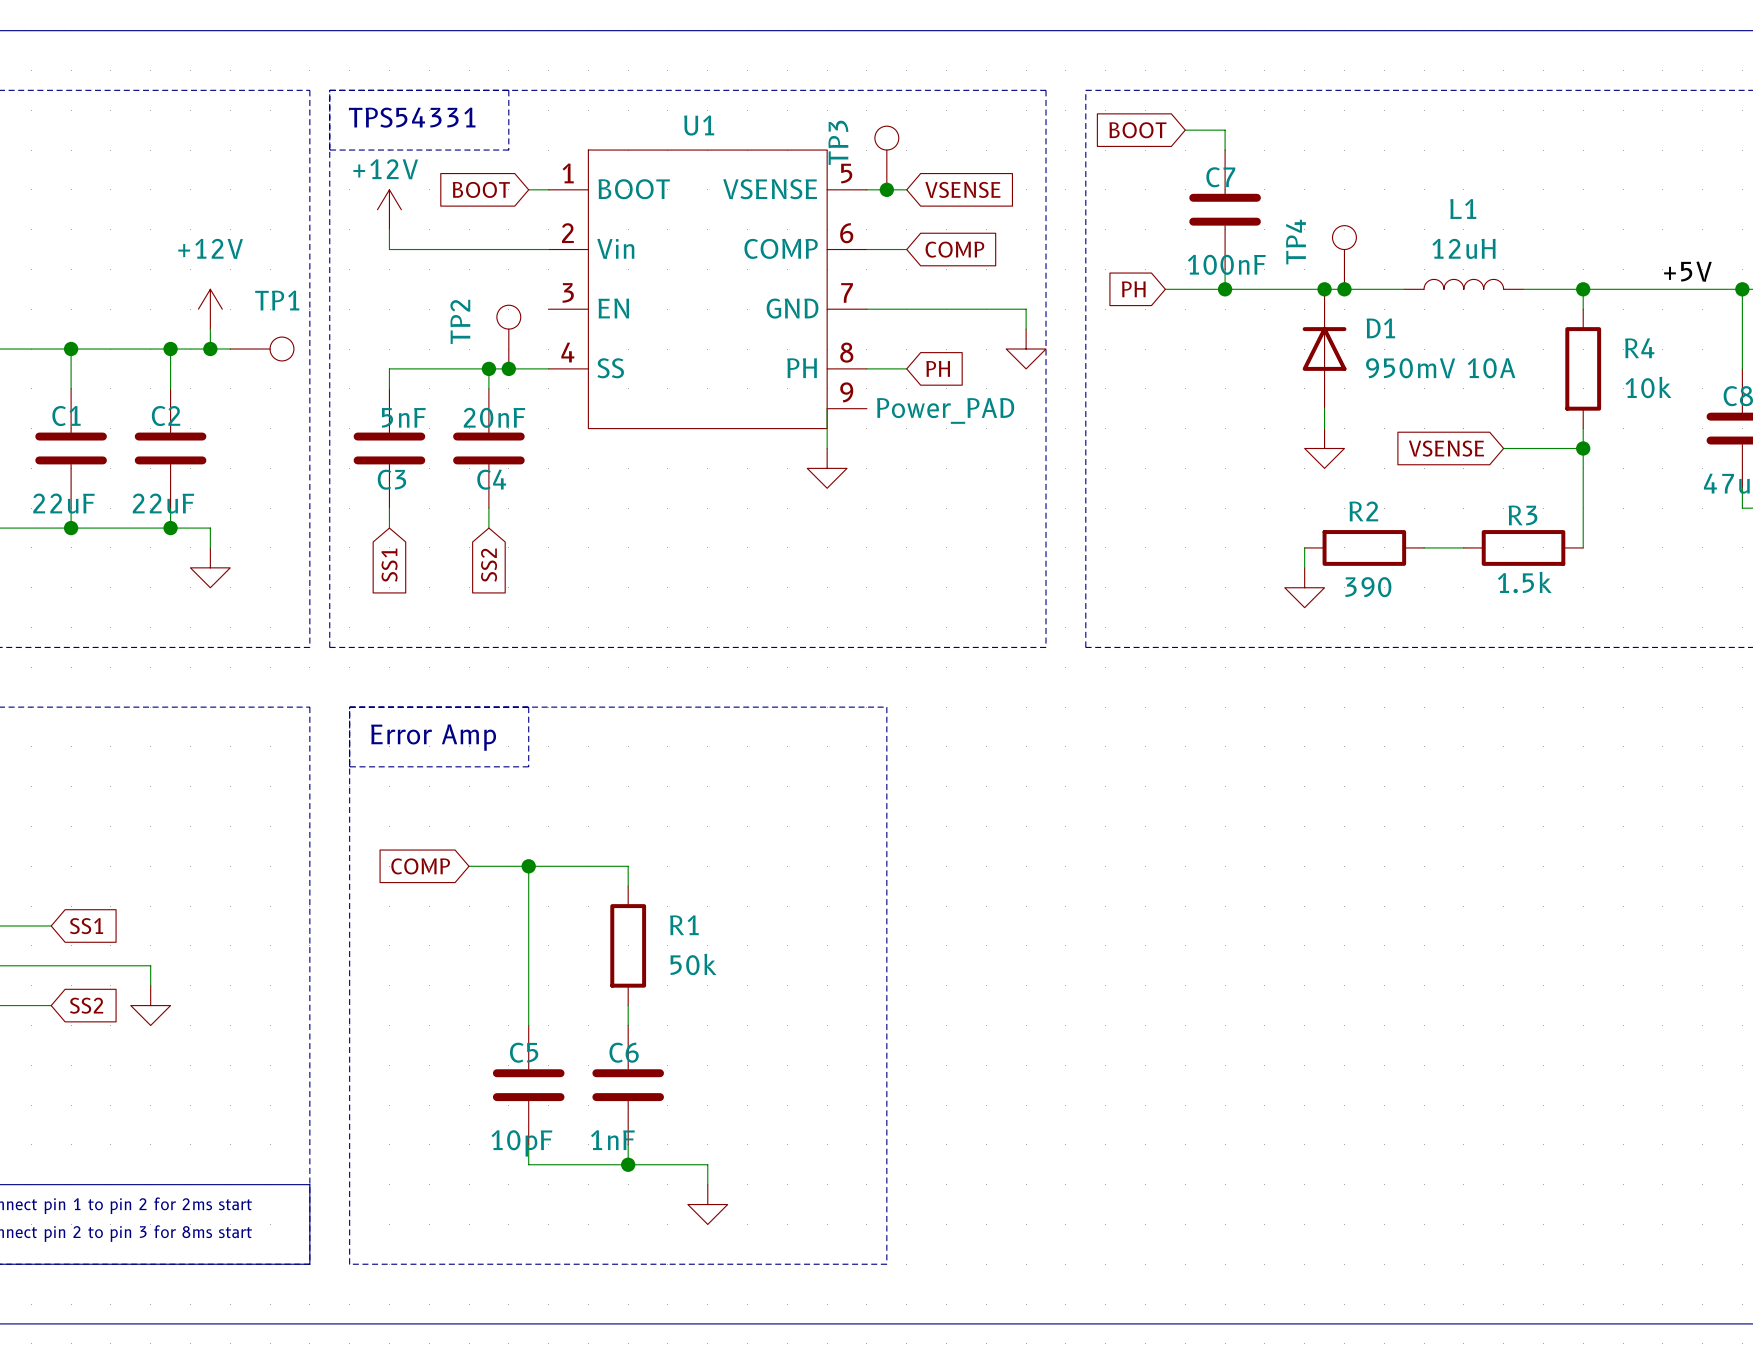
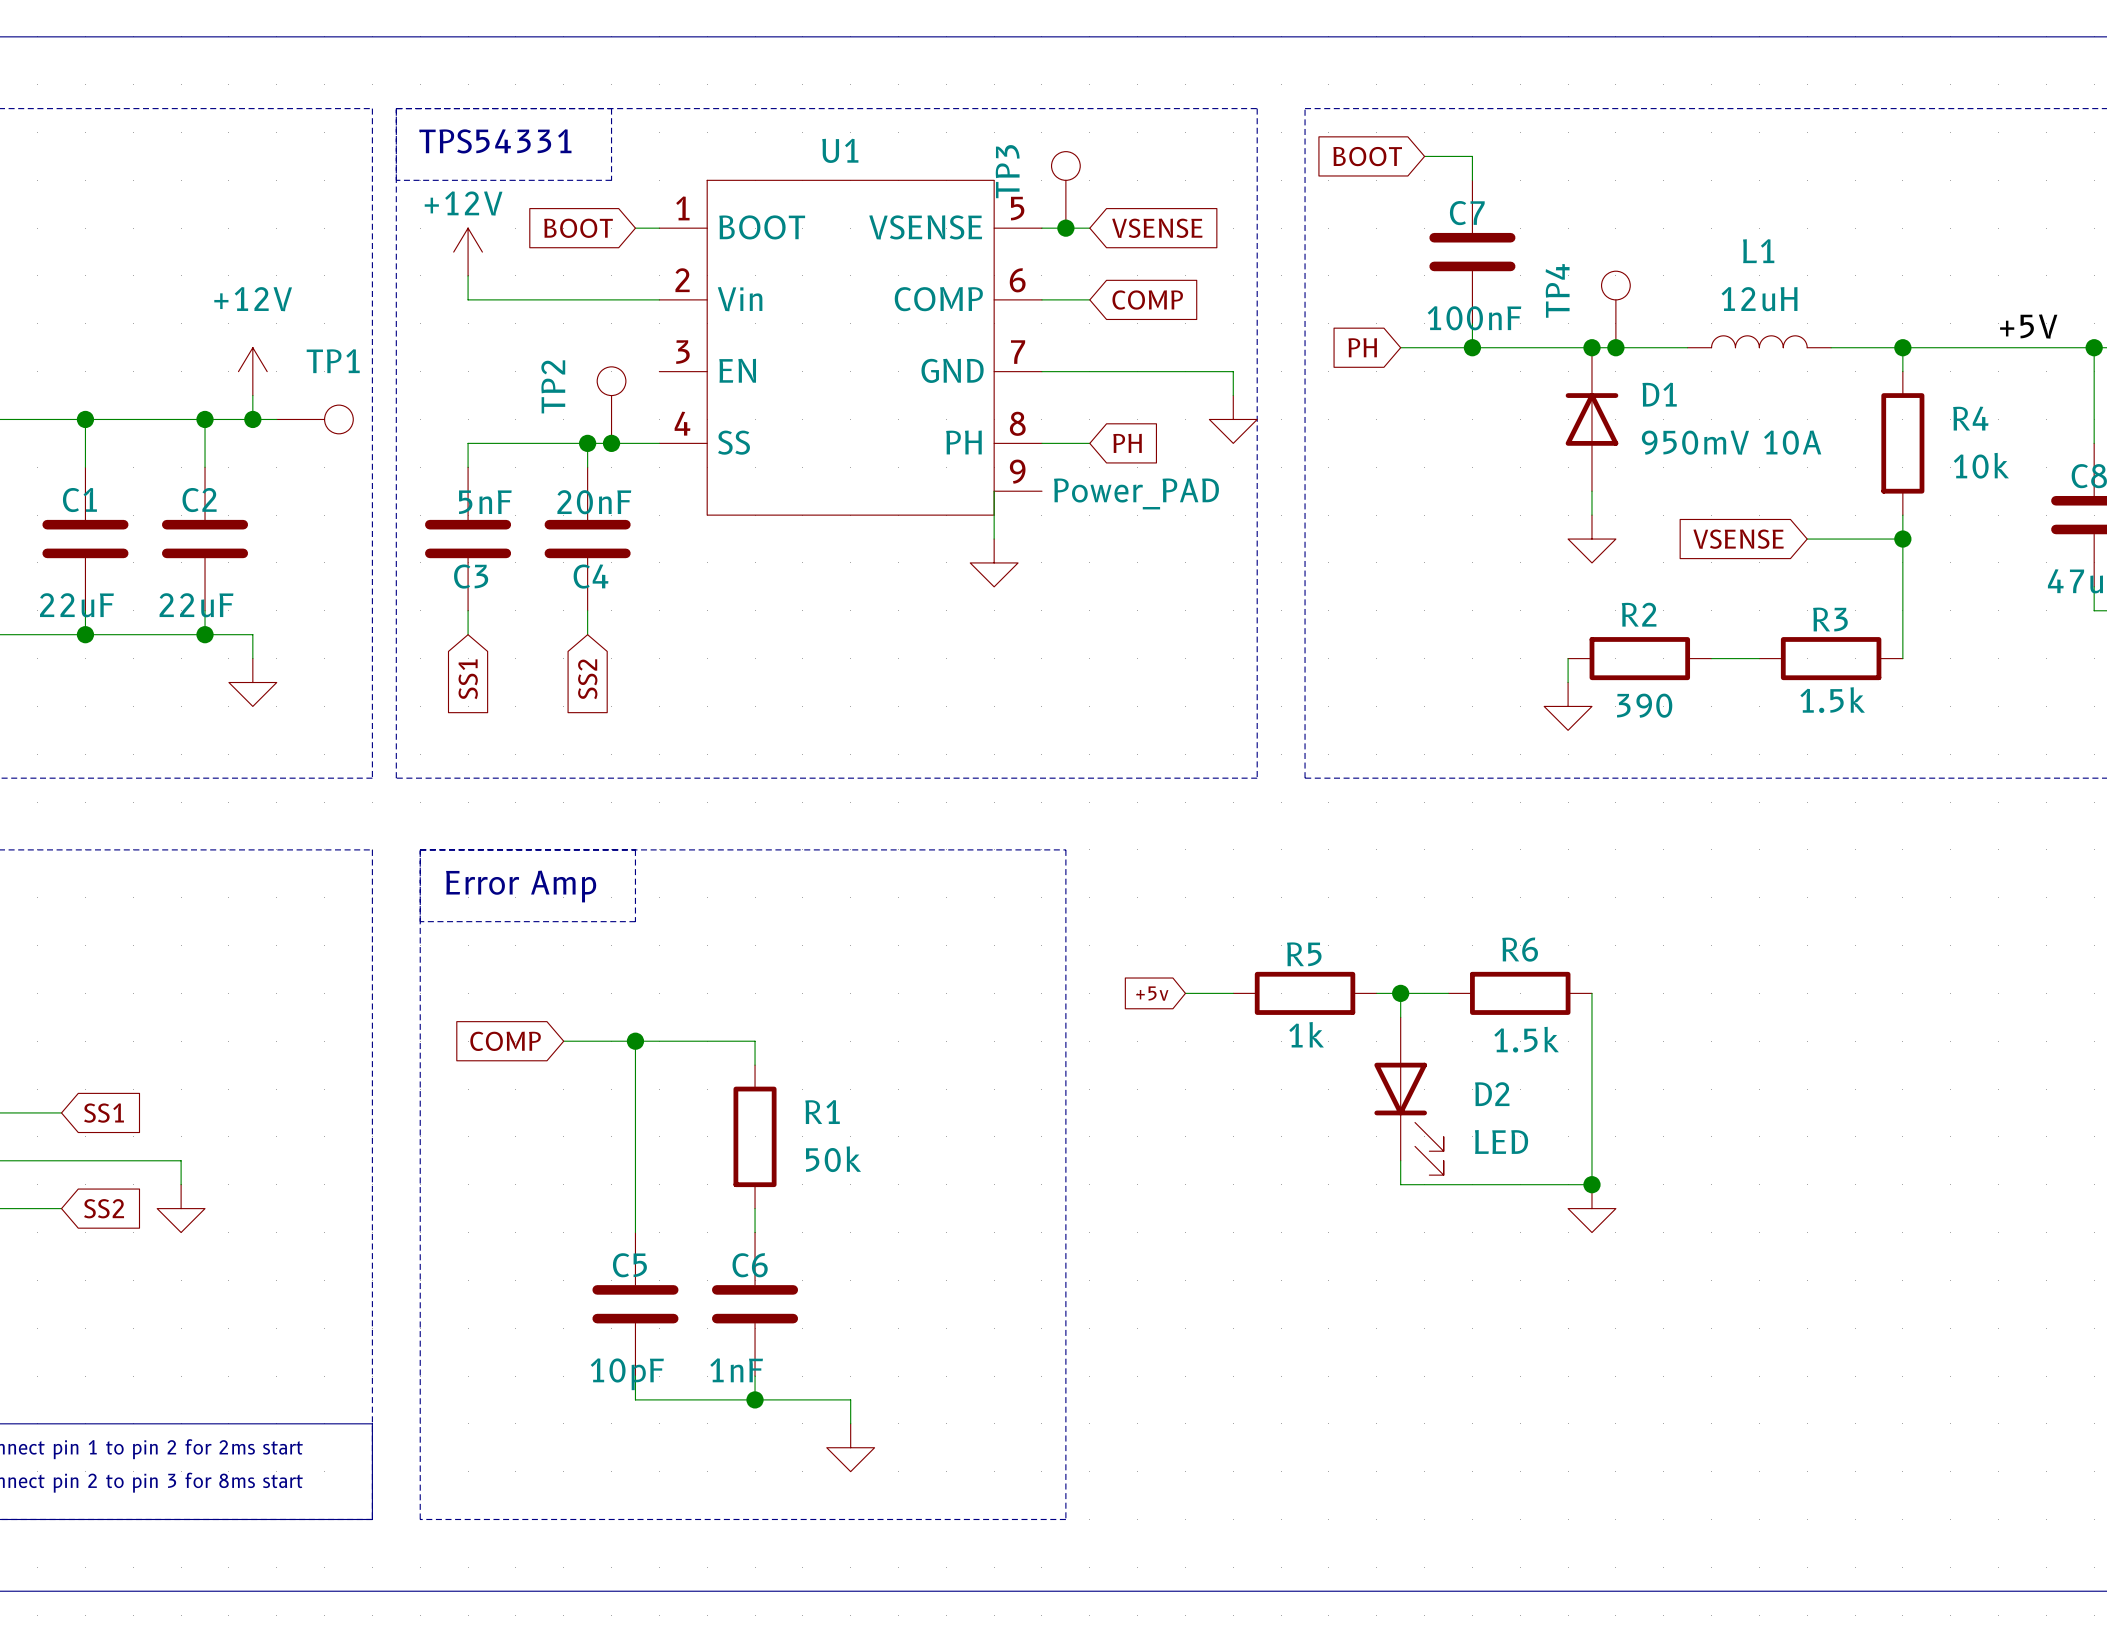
global label: none -> +5v (1152, 993)
wire: none -> (1185, 993) (1233, 993)
R5: none -> 1k (1305, 993)
wire: none -> (1376, 993) (1448, 993)
wire: none -> (1400, 993) (1400, 1017)
junction: none -> (1400, 993)
R6: none -> 1.5k (1520, 993)
wire: none -> (1591, 993) (1591, 1184) (1400, 1184) (1400, 1160)
D2: none -> LED (1409, 1096)
junction: none -> (1591, 1184)
power symbol: none -> (1591, 1208)

